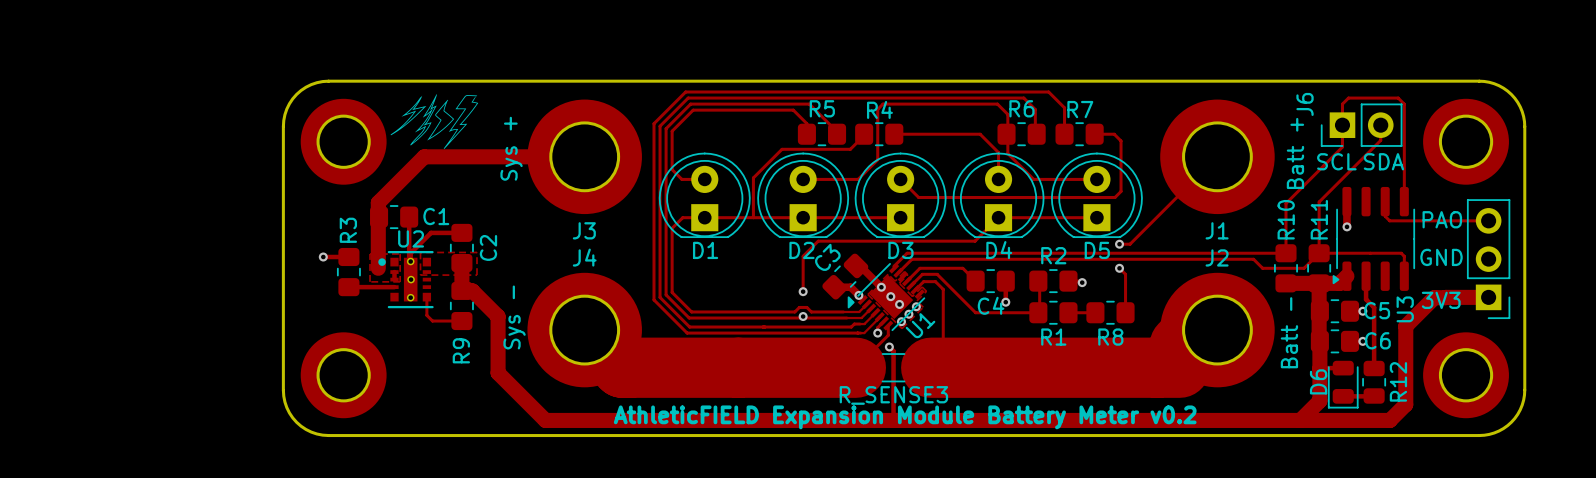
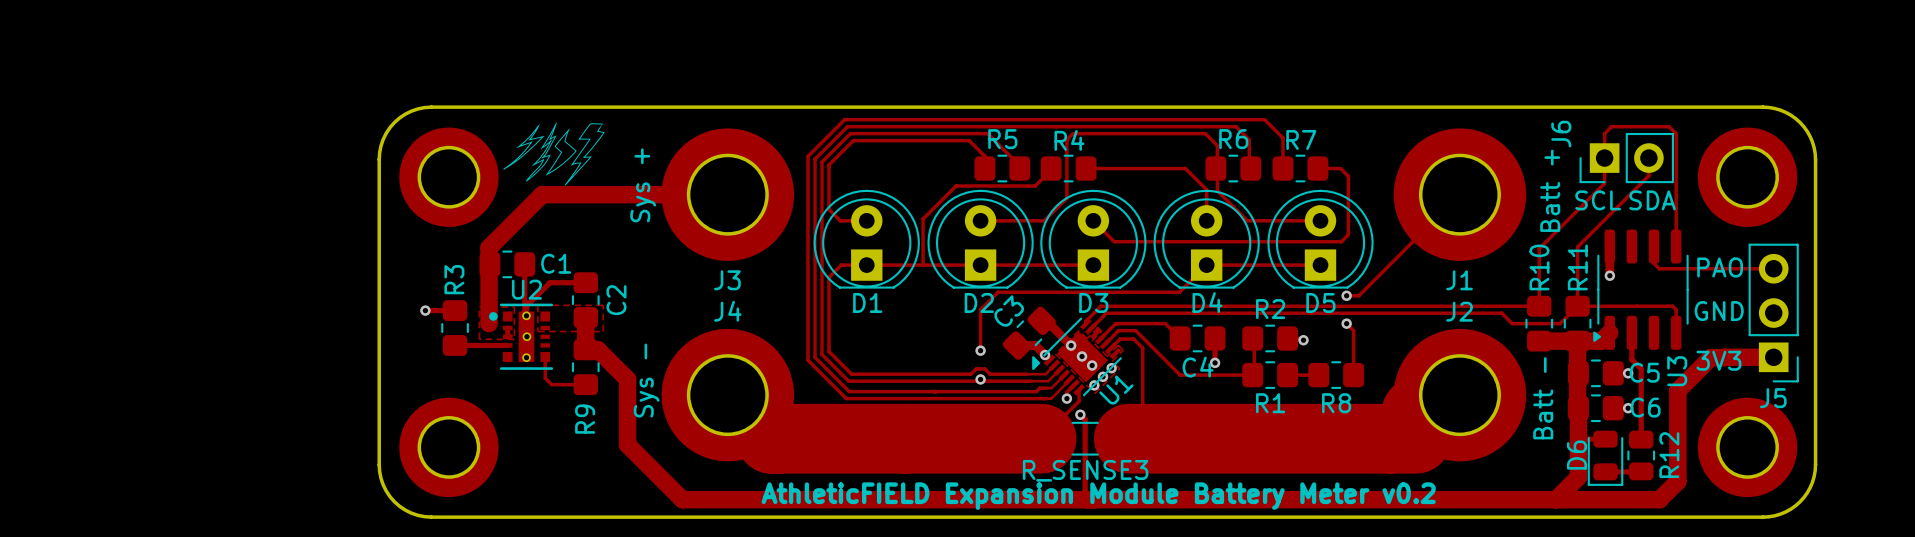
J5 name: none -> J5 (1773, 398)

